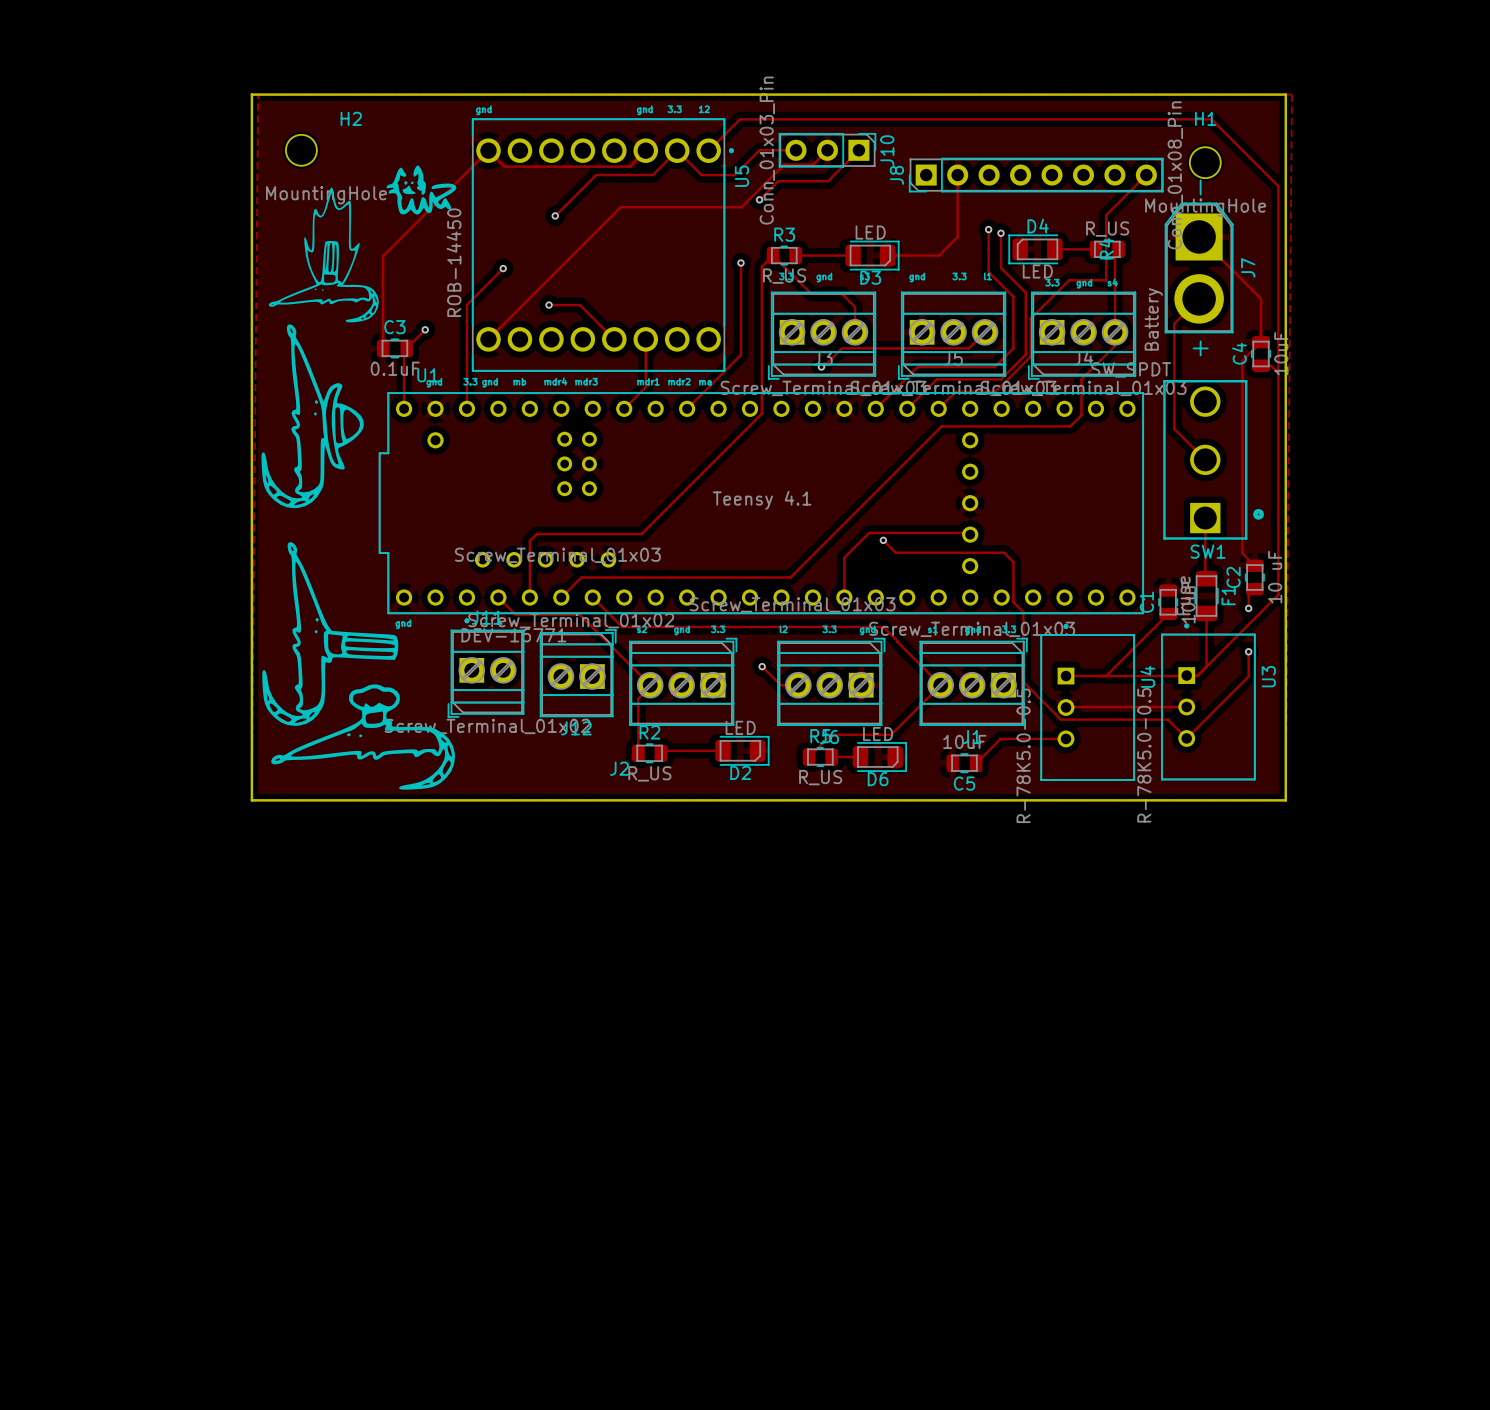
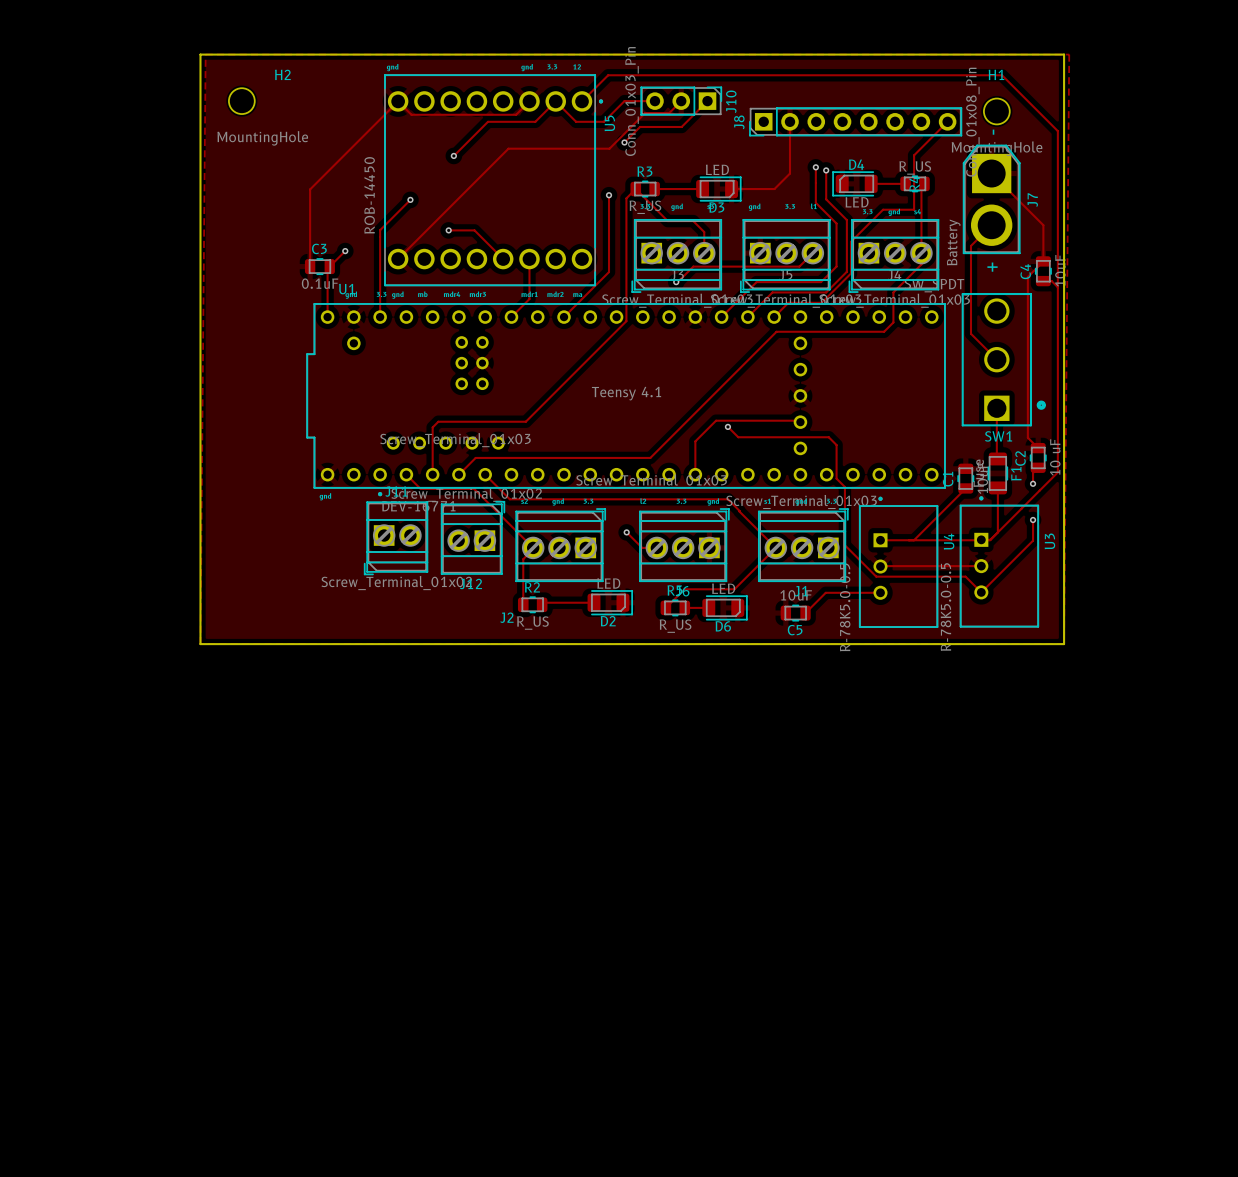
drawing: [261, 165, 457, 509] -> none
drawing: [262, 542, 455, 790] -> none

